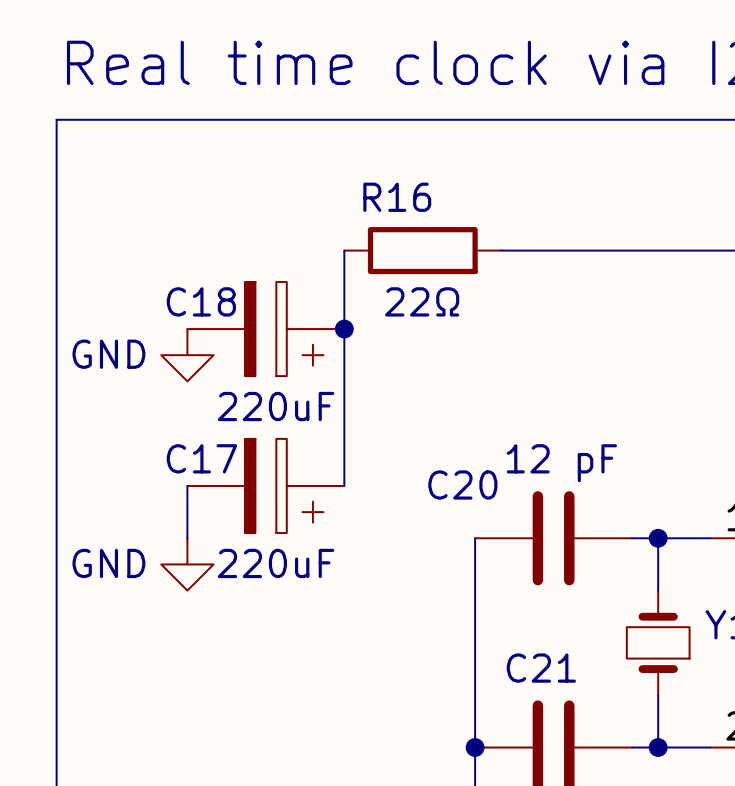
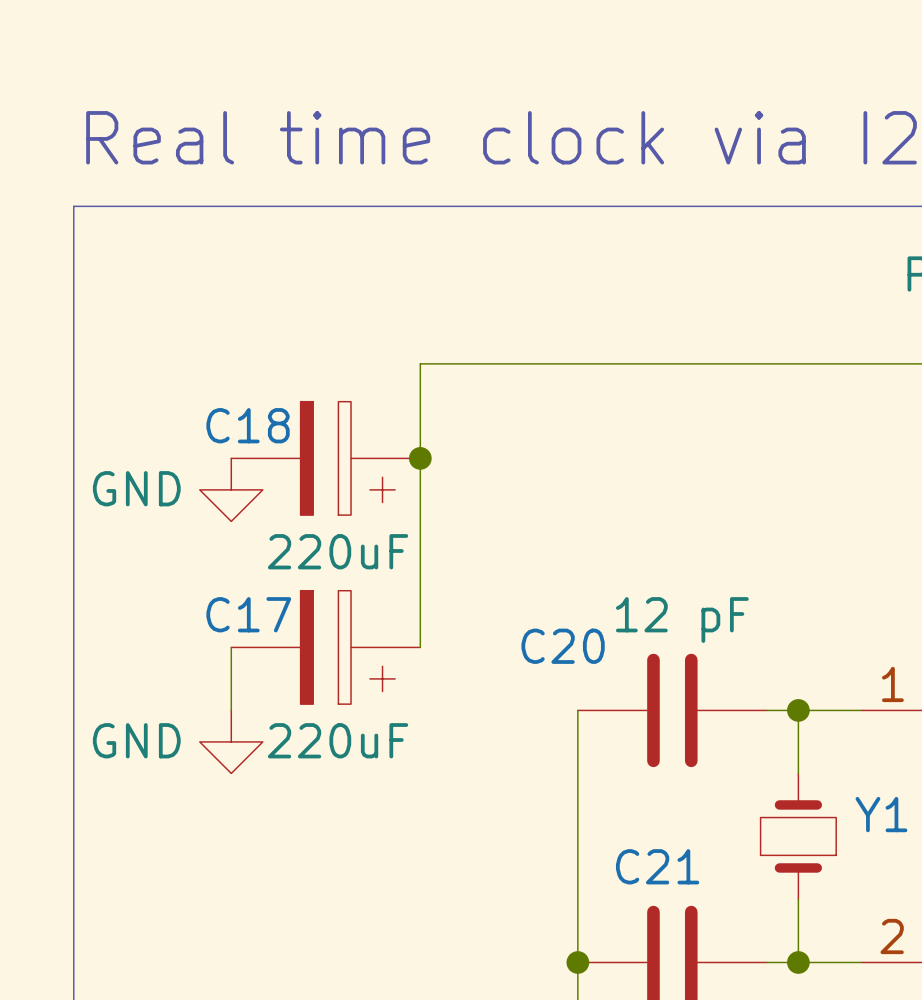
wire: none -> (420, 363) (609, 363)
R16: 22Ω (422, 250) -> none

